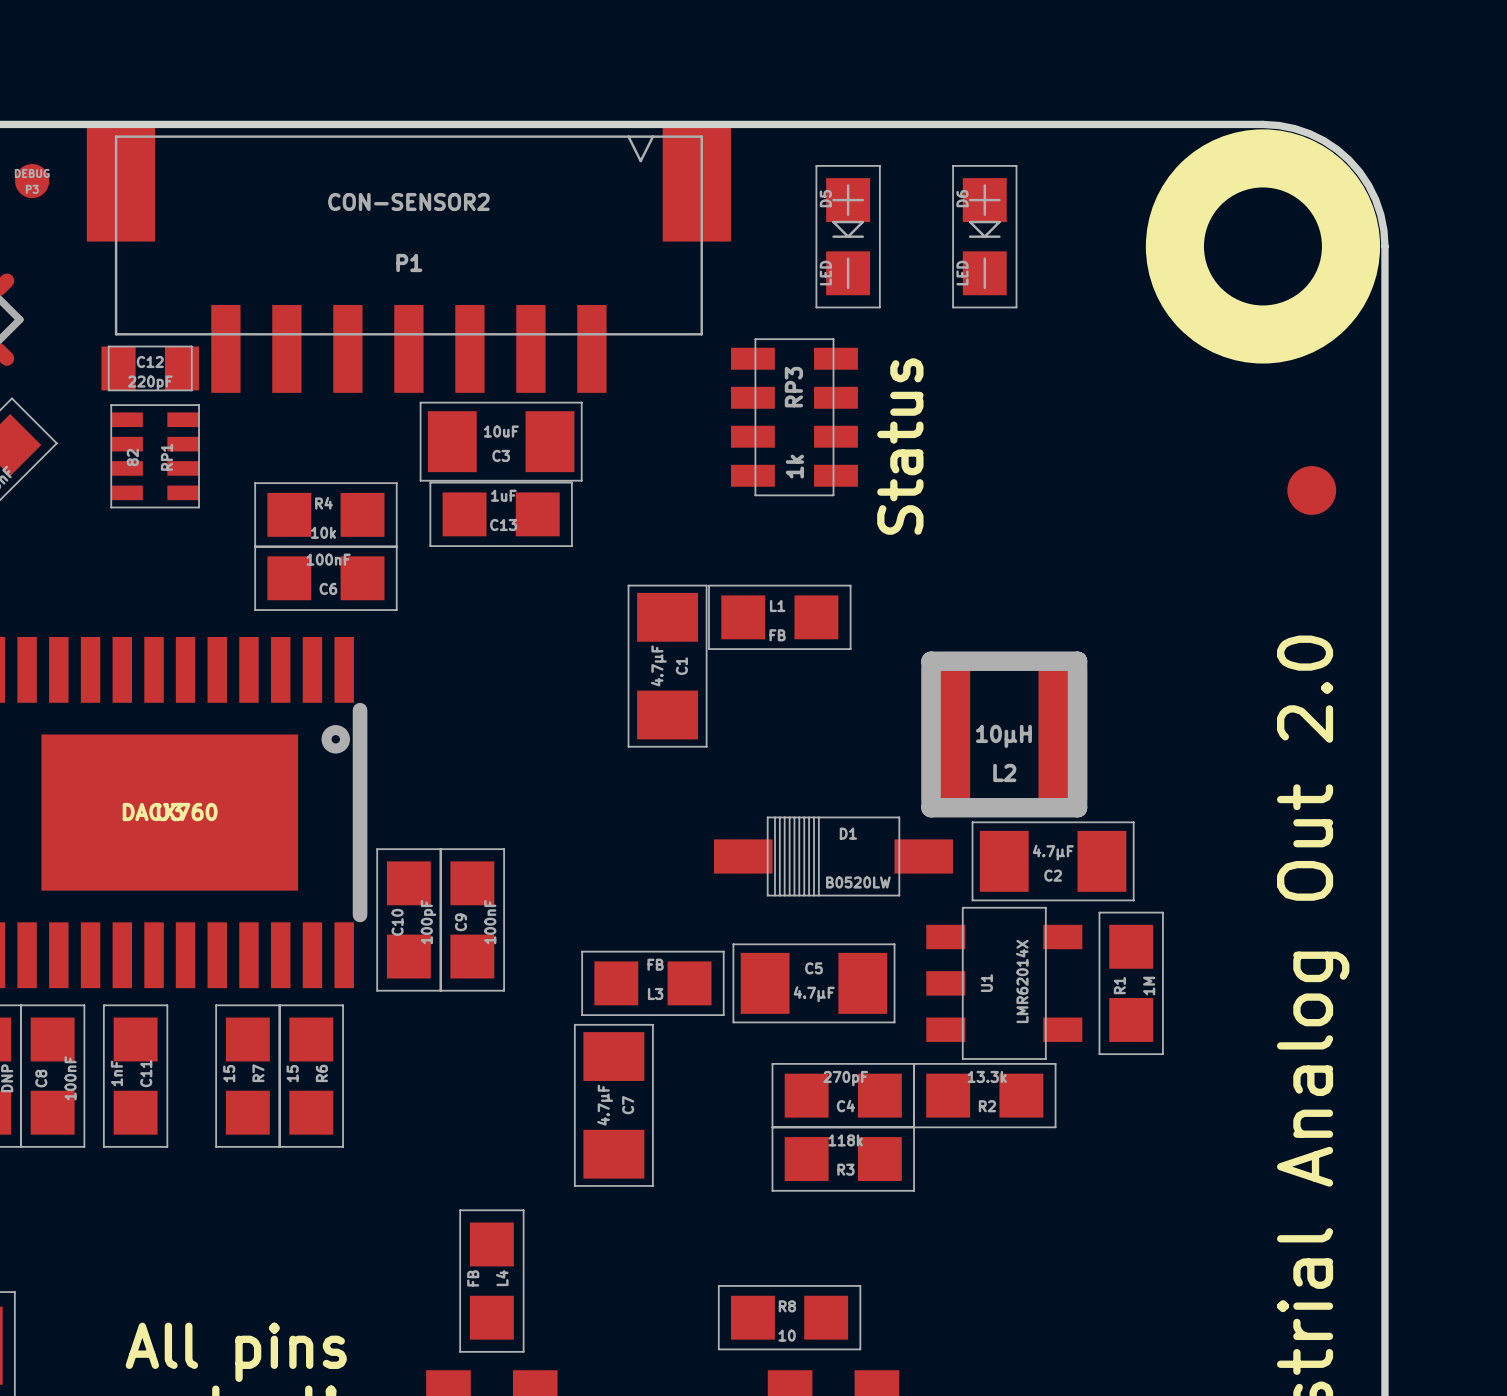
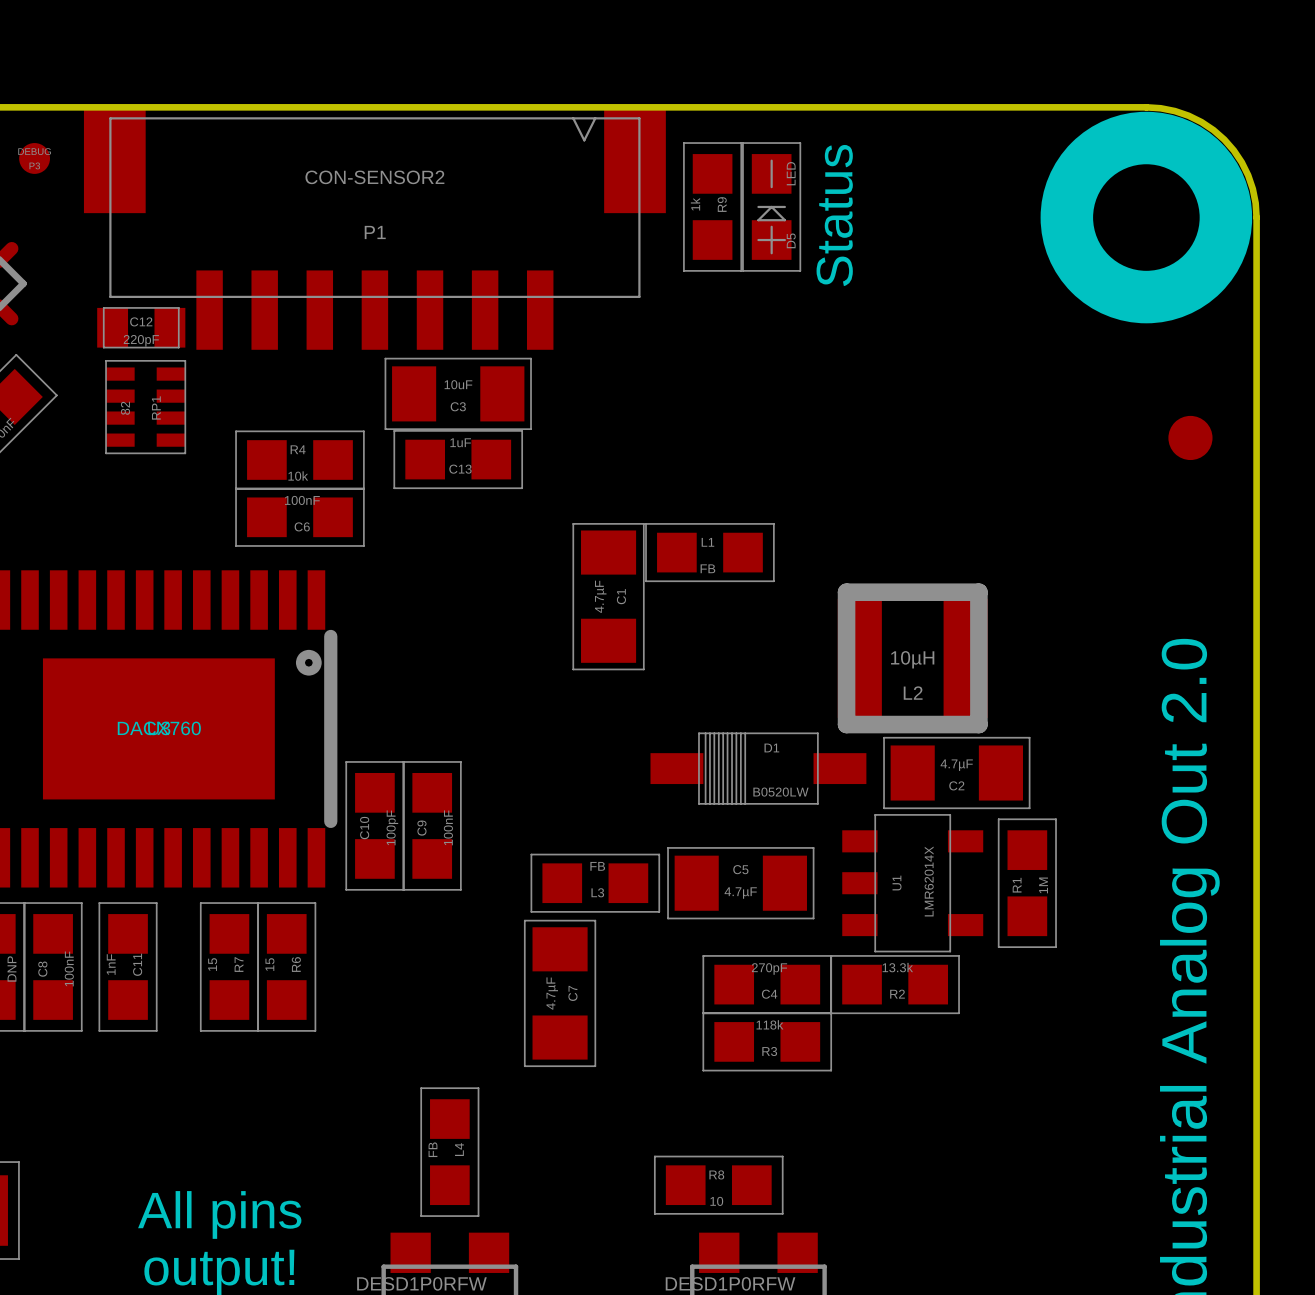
R9: none -> 1k (712, 206)
D5 rotation: 0° (848, 236) -> 180° (771, 206)
D6: LED (984, 236) -> none
RP3: 1k (794, 417) -> none
text position: Status (900, 446) -> Status (834, 215)

